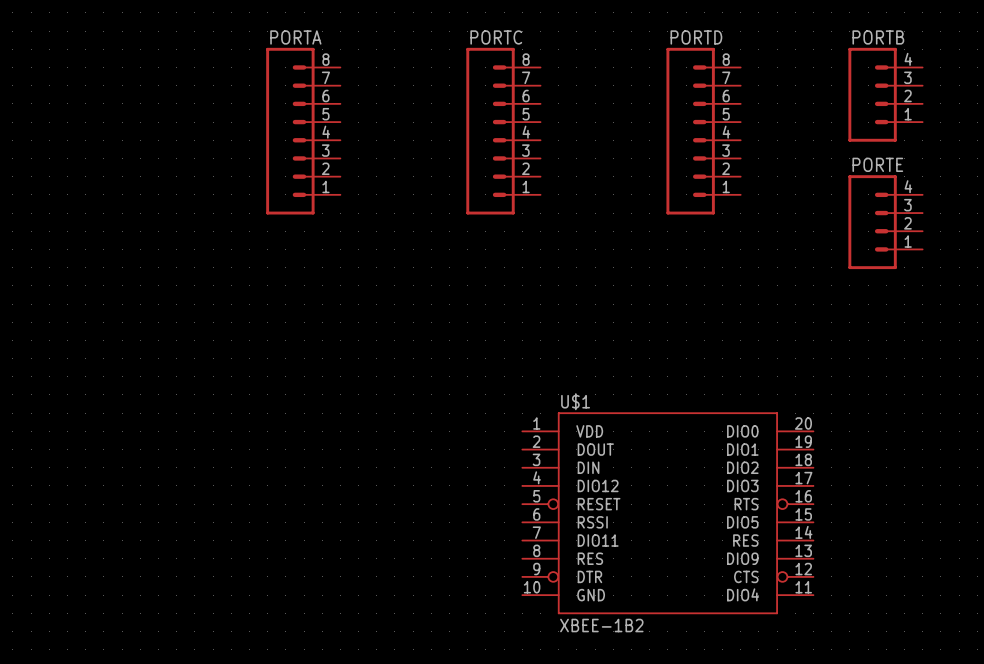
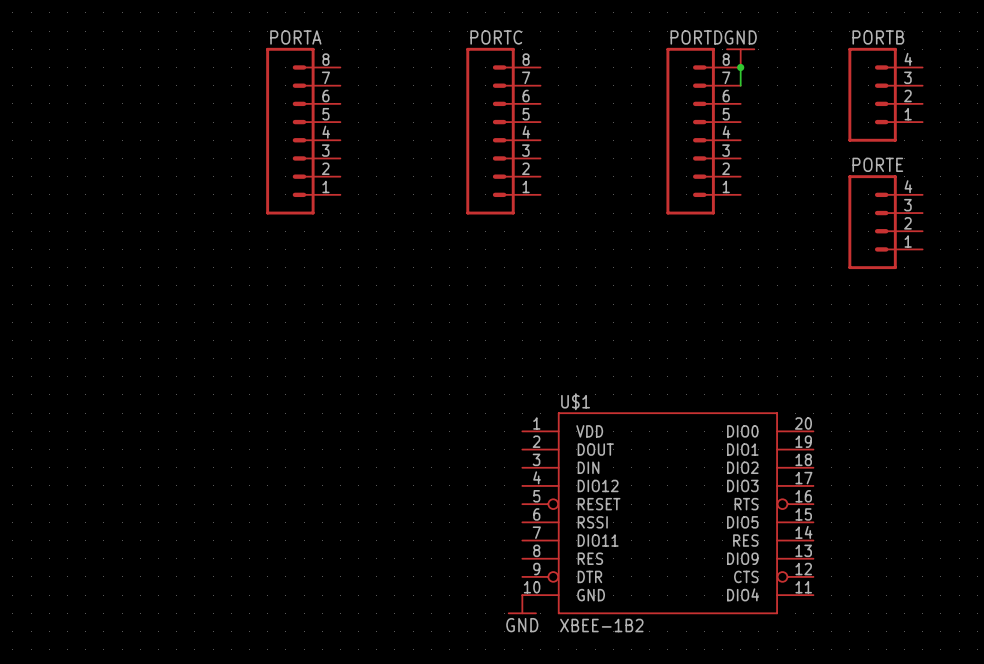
power symbol: none -> GND (740, 57)
wire: none -> (740, 67) (740, 85)
junction: none -> (740, 67)
power symbol: none -> GND (522, 604)

